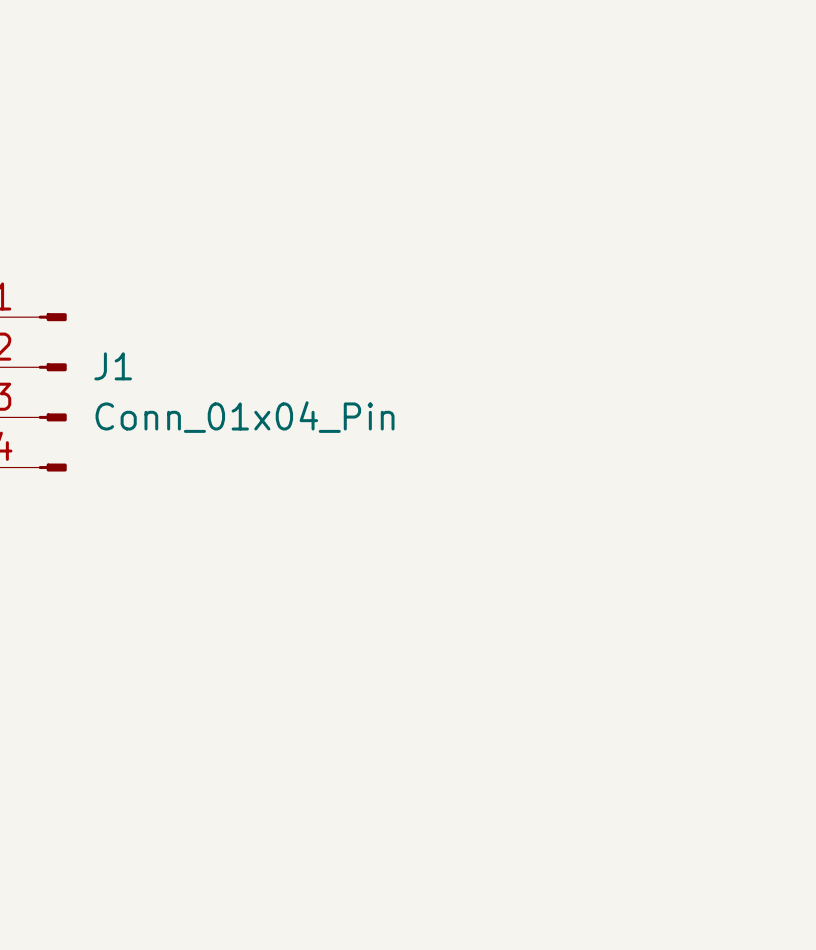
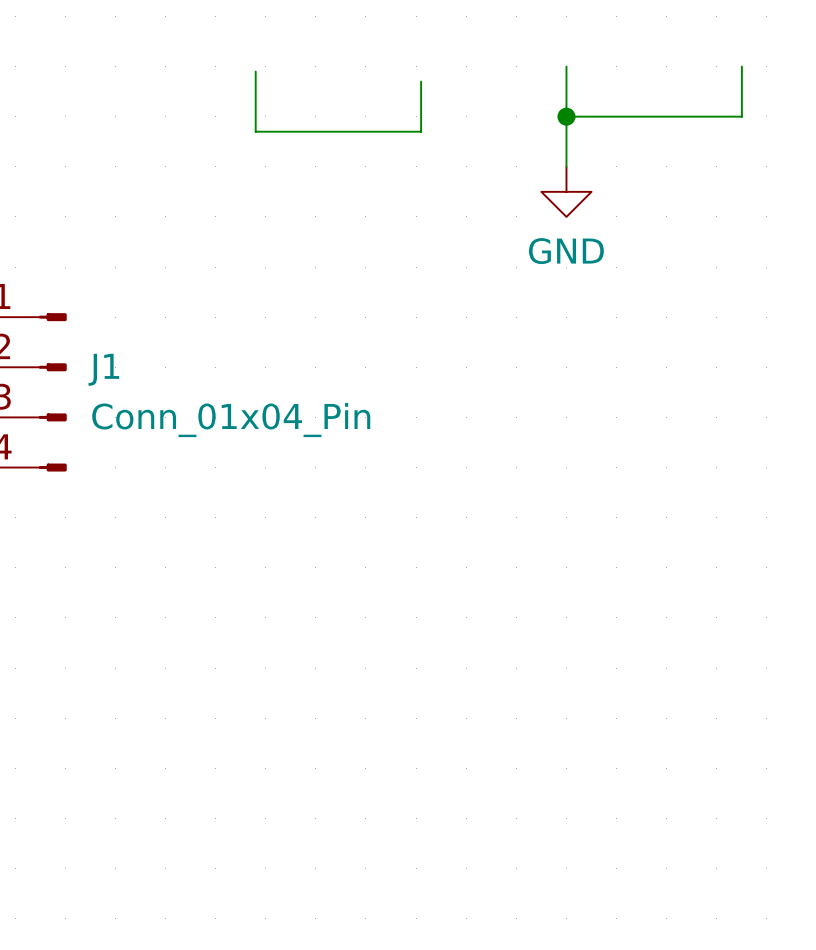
wire: none -> (566, 66) (566, 166)
wire: none -> (741, 66) (741, 116) (566, 116)
wire: none -> (255, 71) (255, 131) (421, 131) (421, 81)
junction: none -> (566, 116)
power symbol: none -> GND (566, 191)

